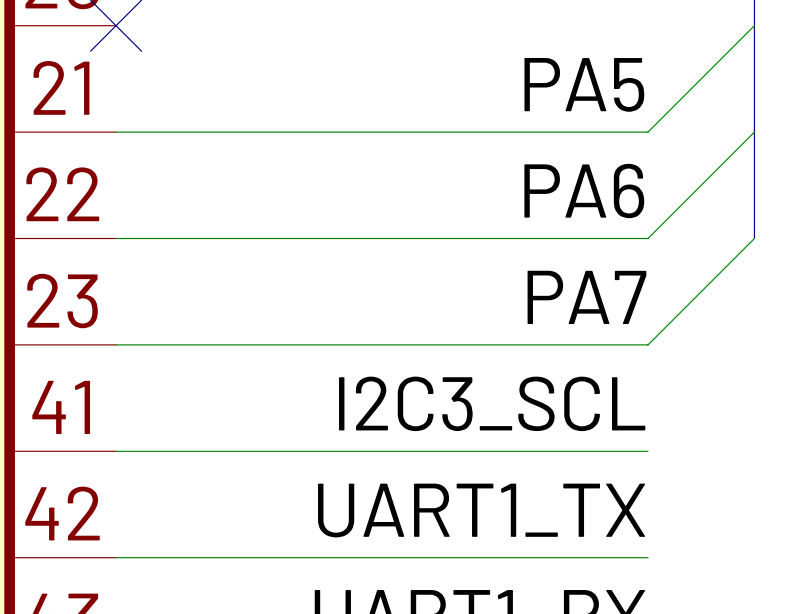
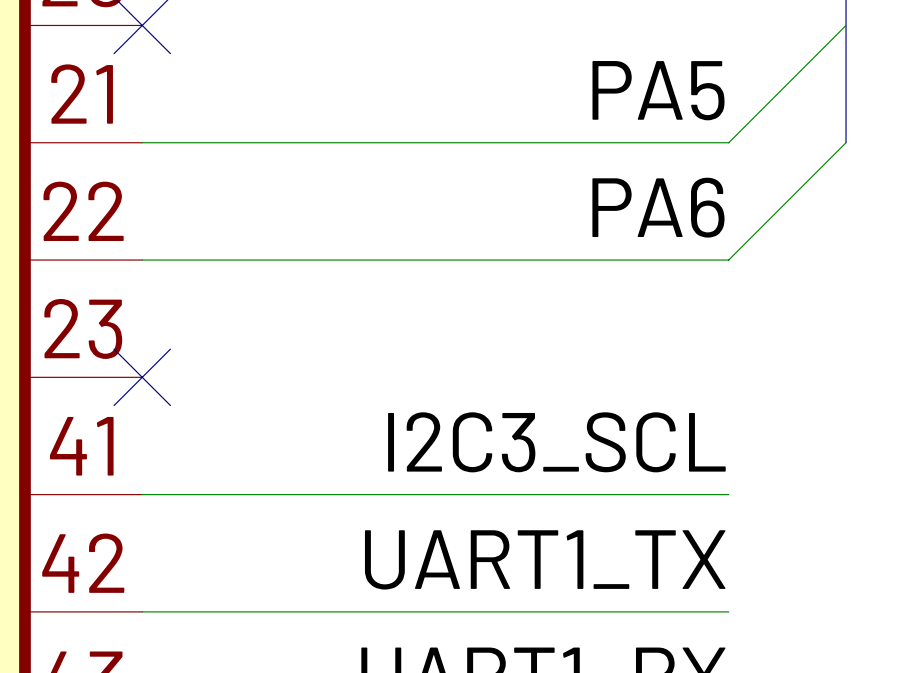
bus: (754, 132) (754, 238) -> none
wire: (754, 238) (648, 344) (116, 344) -> none
label: PA7 (586, 297) -> none
no-connect mark: none -> (142, 377)

